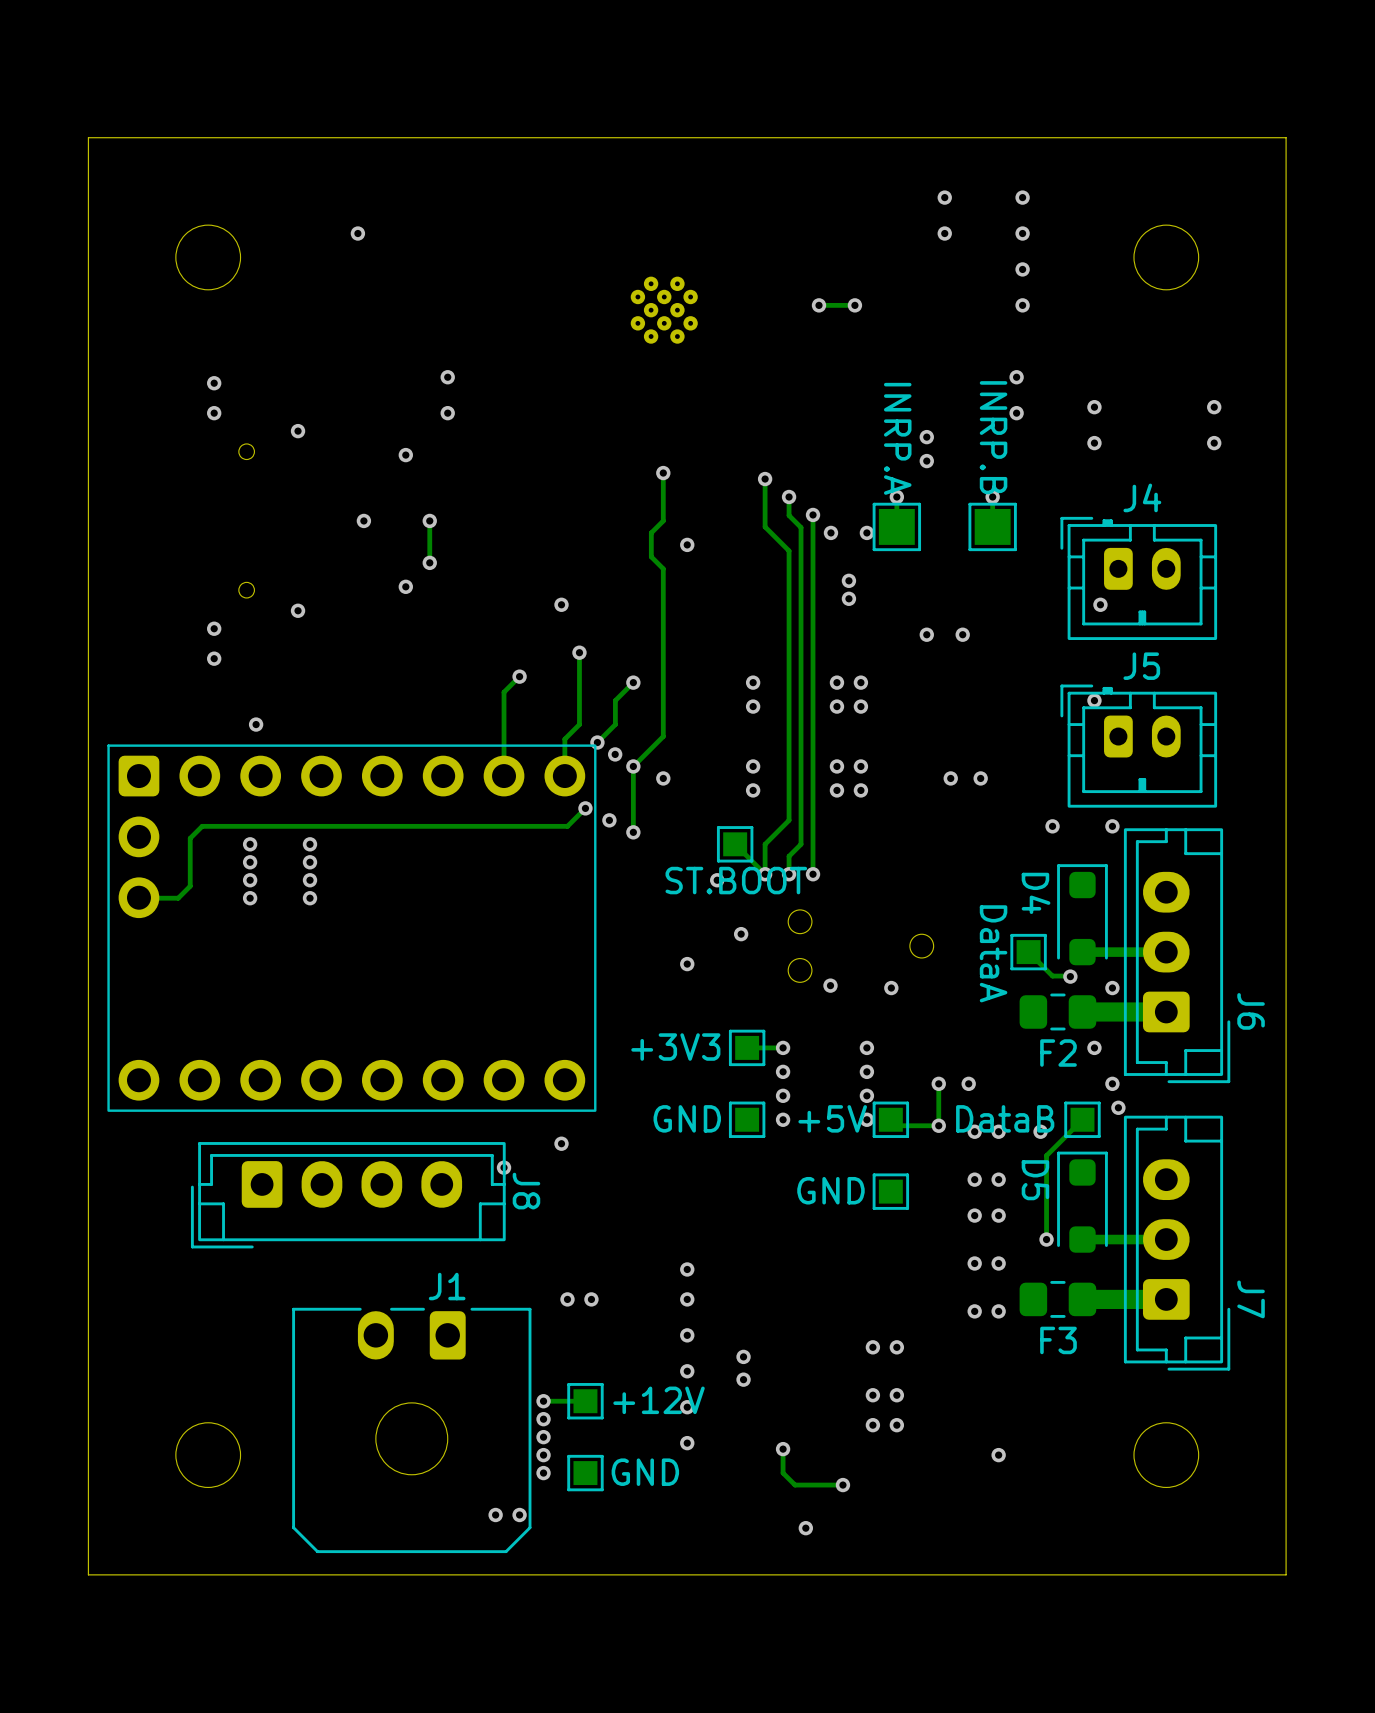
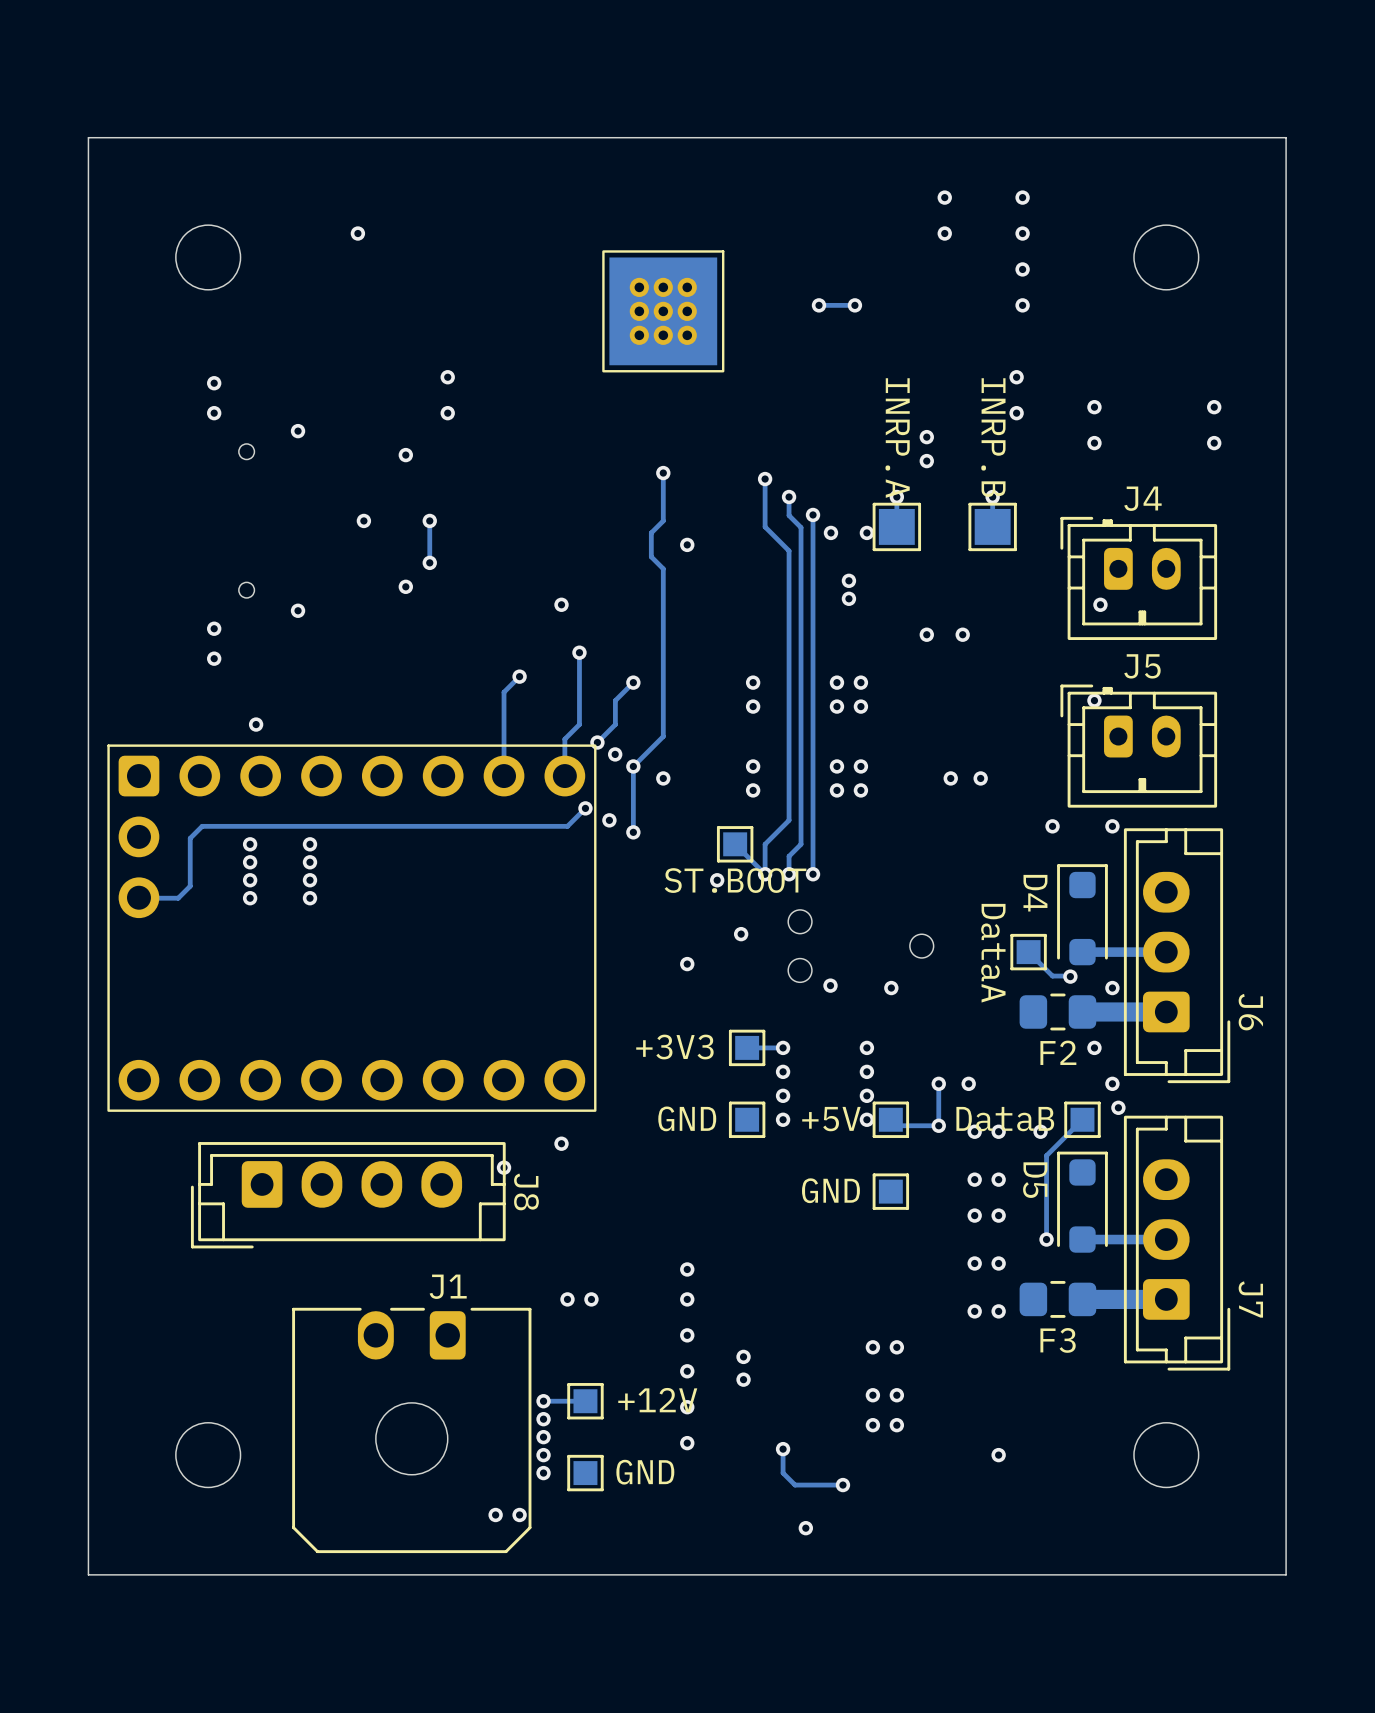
part footprint: [630, 276, 698, 344] -> [602, 250, 725, 373]

